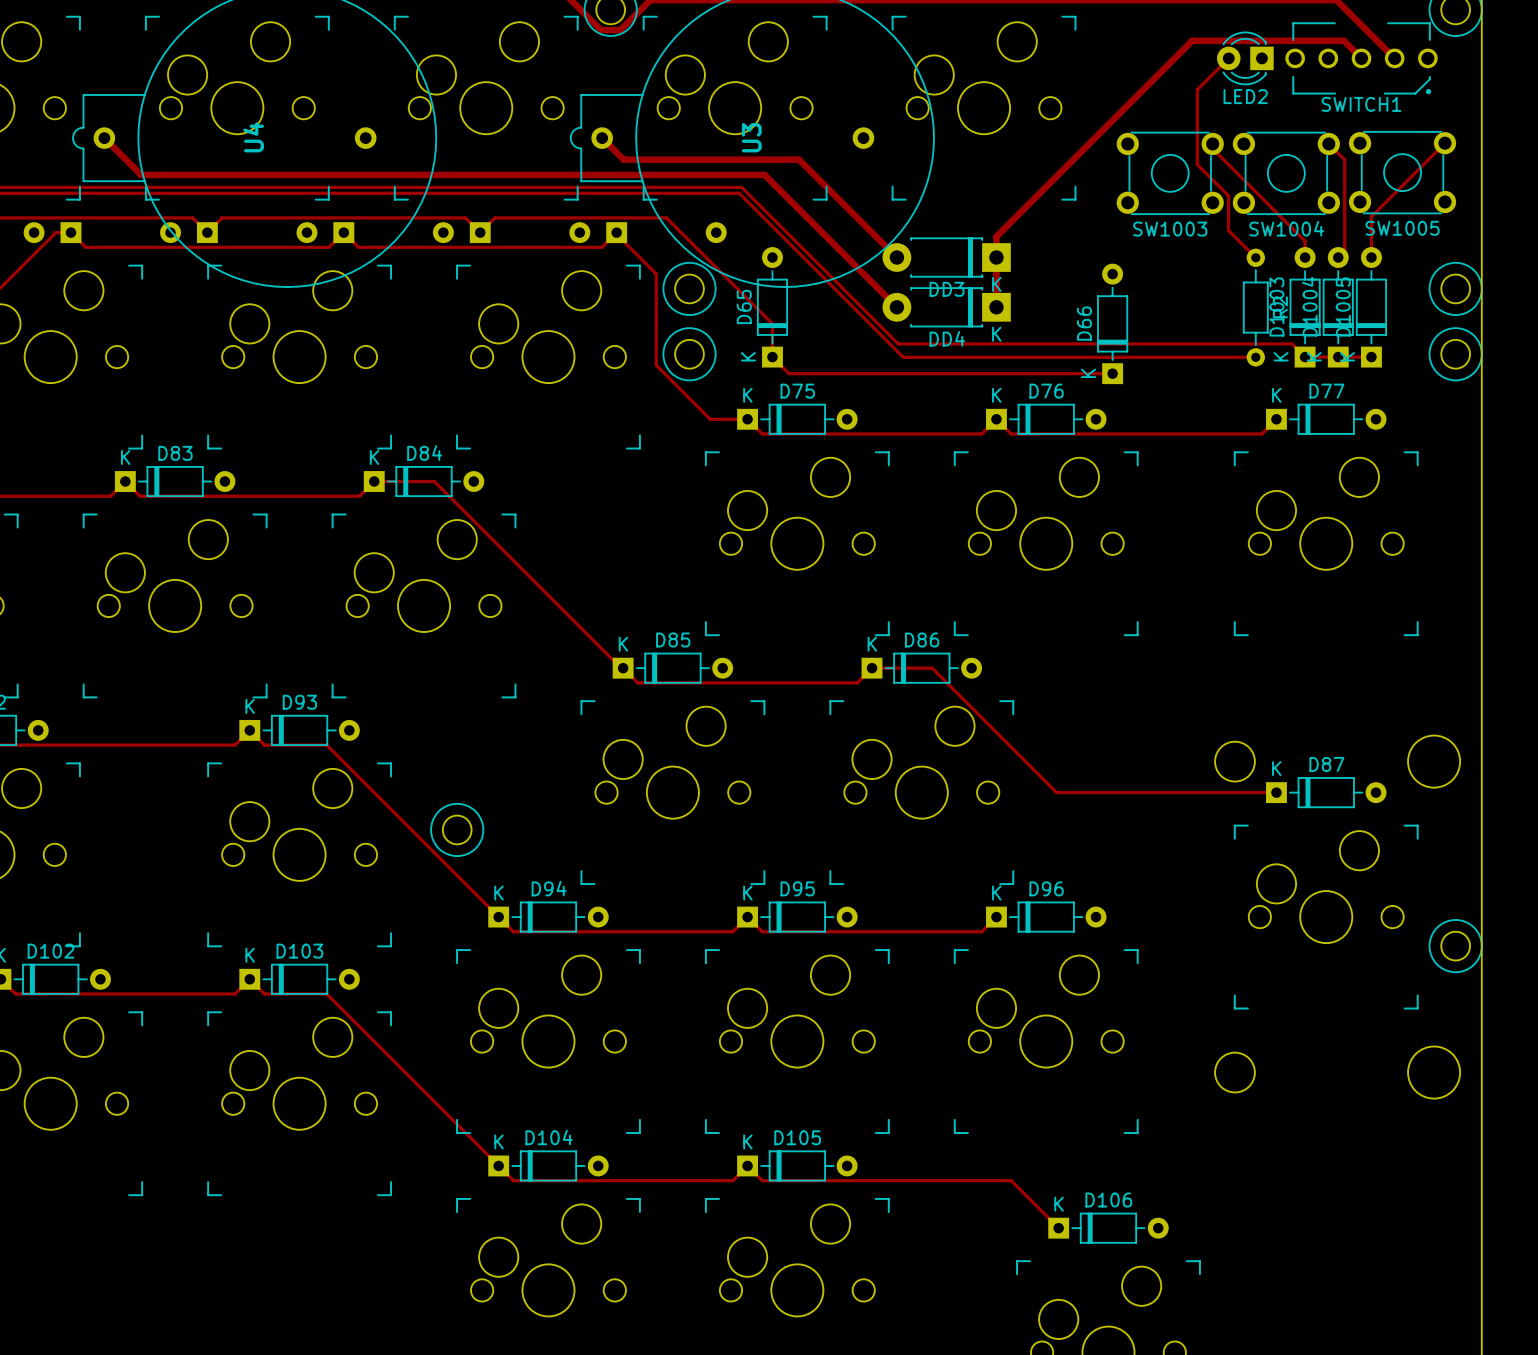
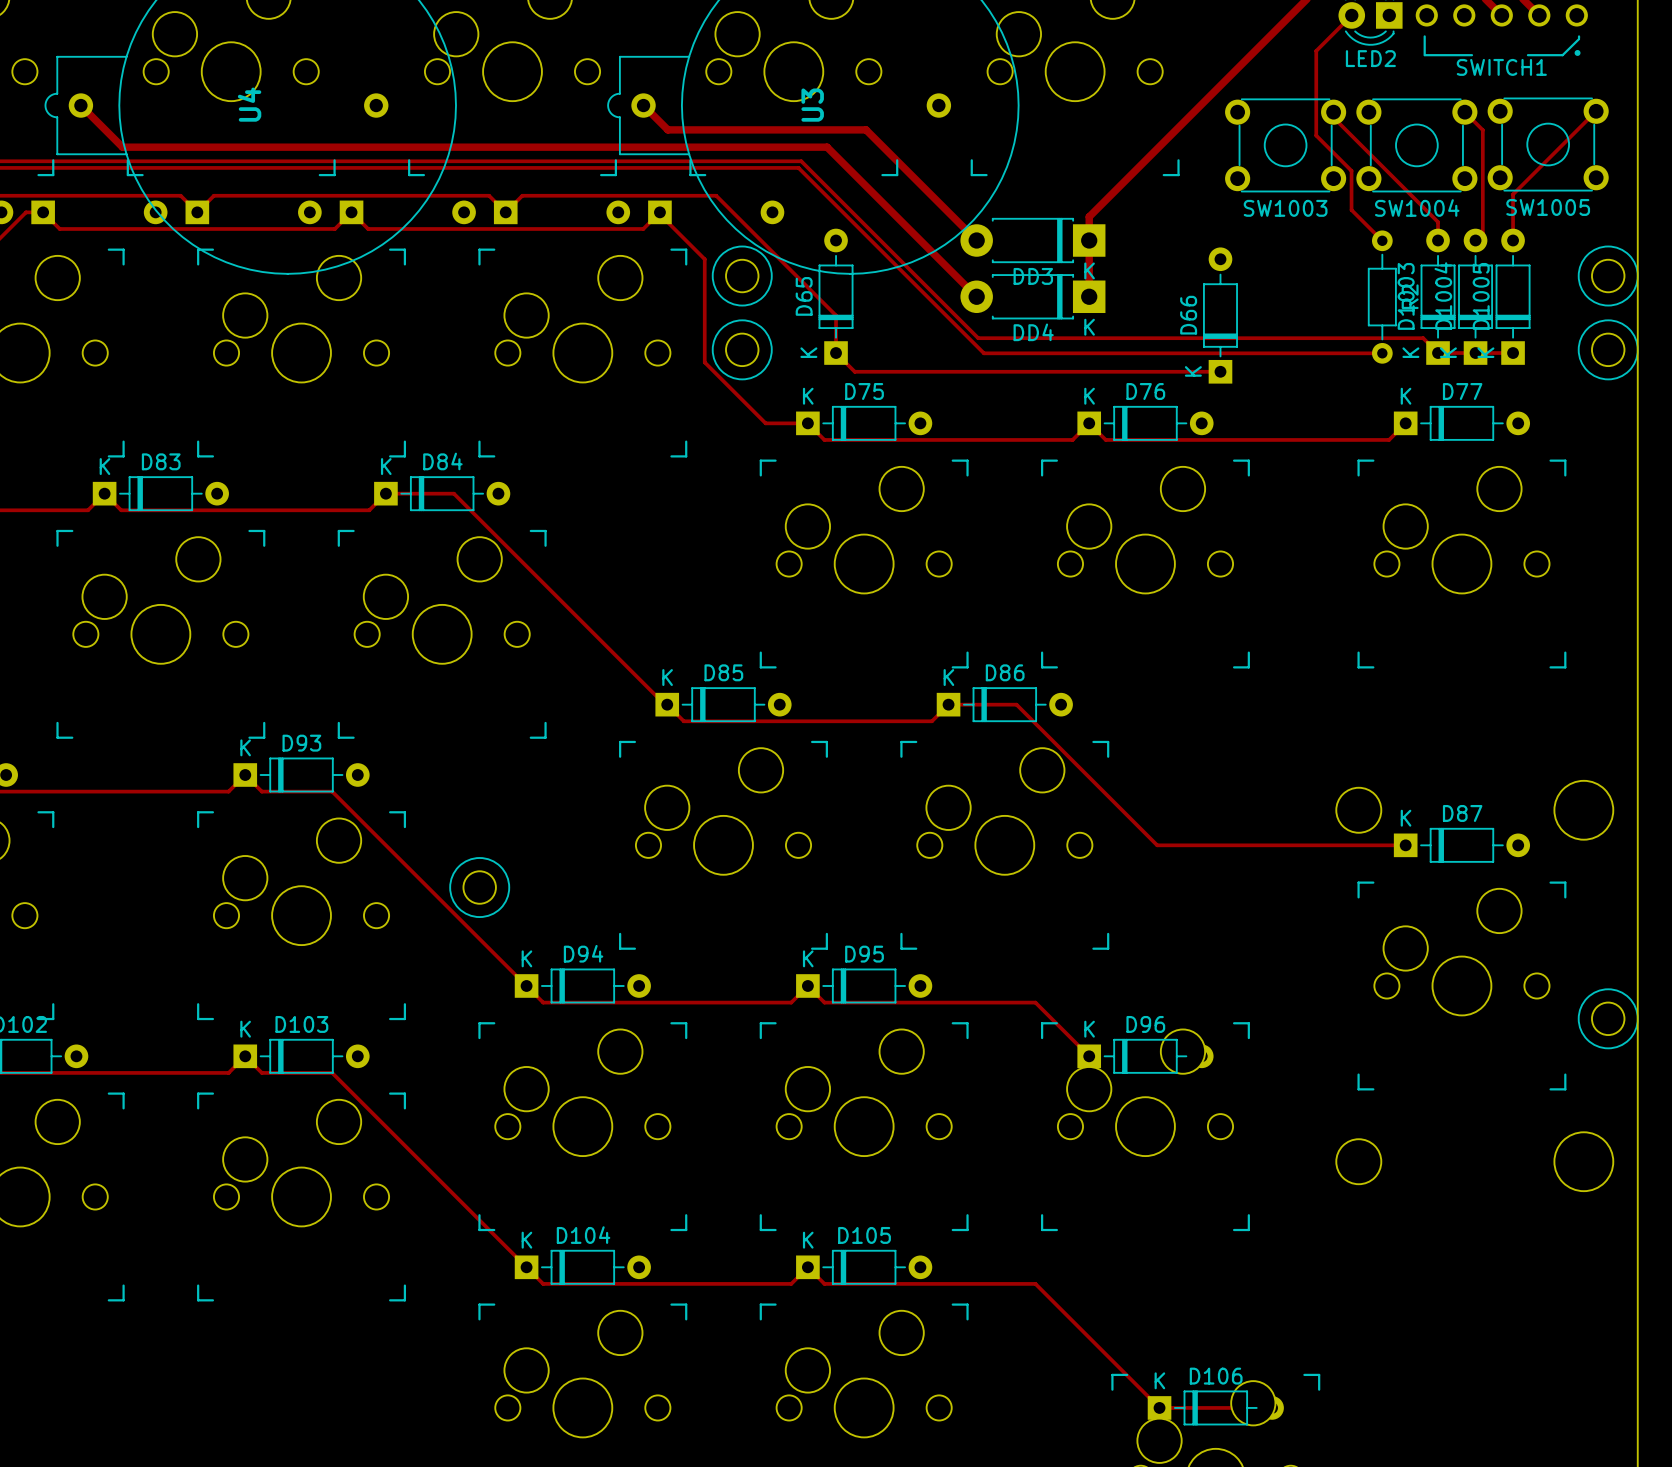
track: (996, 917) (981, 931) (948, 931) -> (1089, 1056) (1035, 1002)
D96 position: (1046, 917) -> (1145, 1056)
track: (948, 1180) (1011, 1180) (1058, 1228) -> (1035, 1283) (1159, 1407) (1234, 1407)
D106 position: (1108, 1228) -> (1215, 1407)

